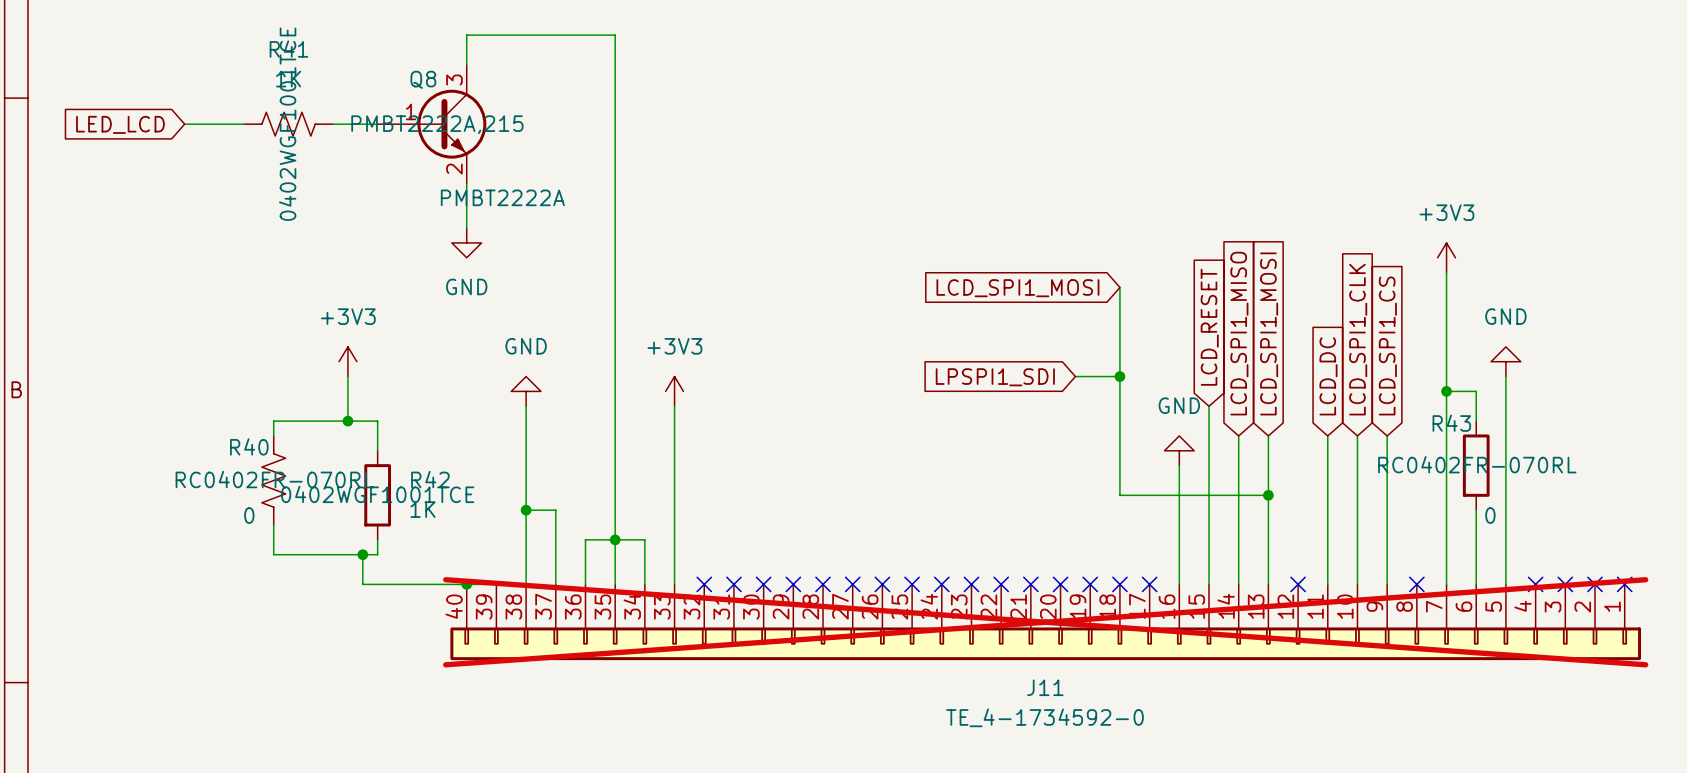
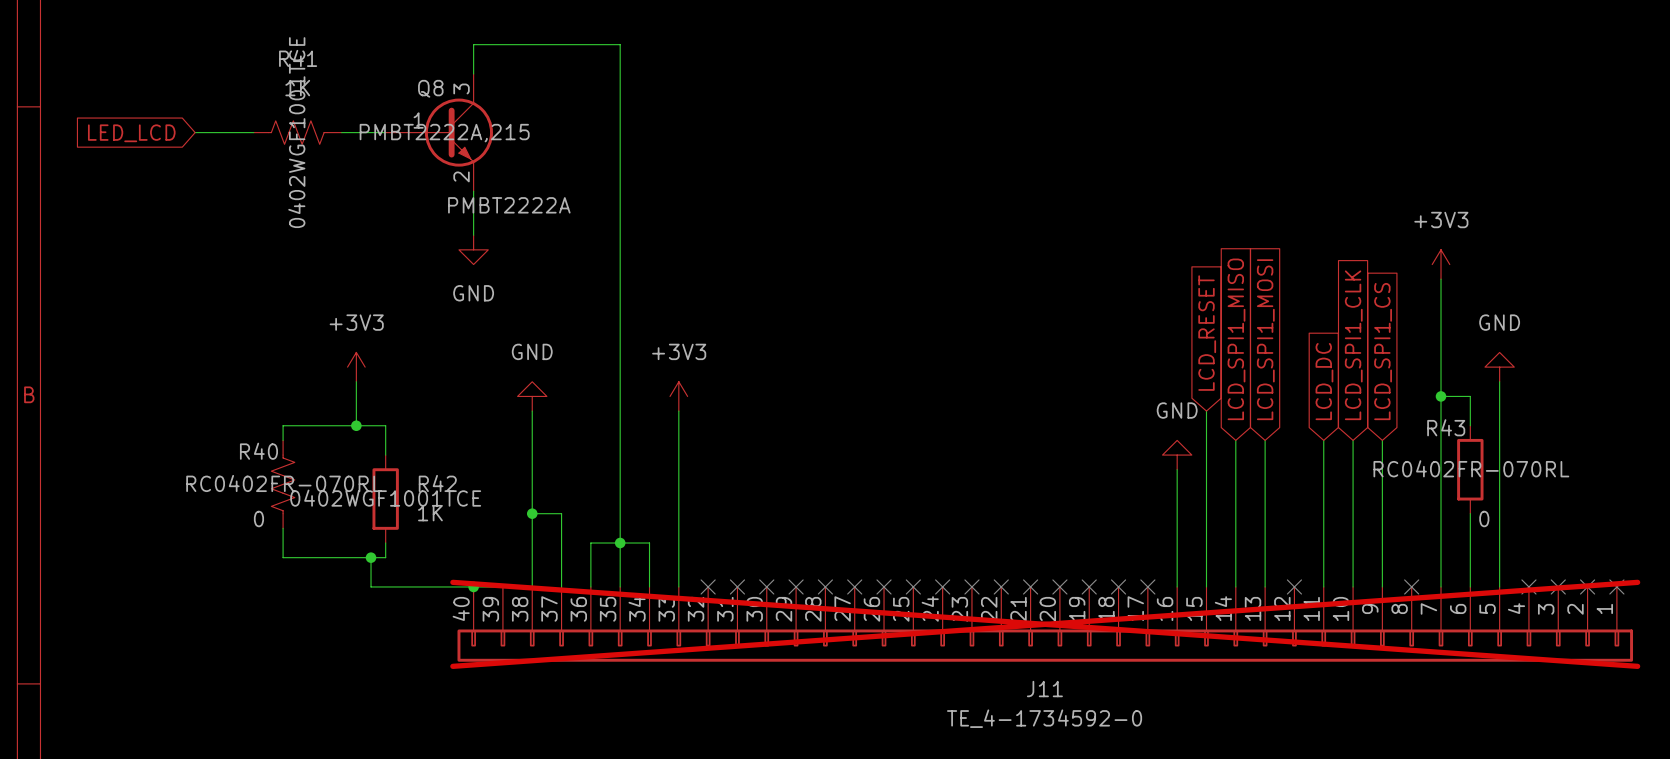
wire: (1119, 287) (1119, 495) (1268, 495) -> none
global label: LCD_SPI1_MOSI (1017, 288) -> none
wire: (1075, 376) (1119, 376) -> none
junction: (1119, 376) -> none
global label: LPSPI1_SDI (995, 377) -> none
junction: (1268, 495) -> none

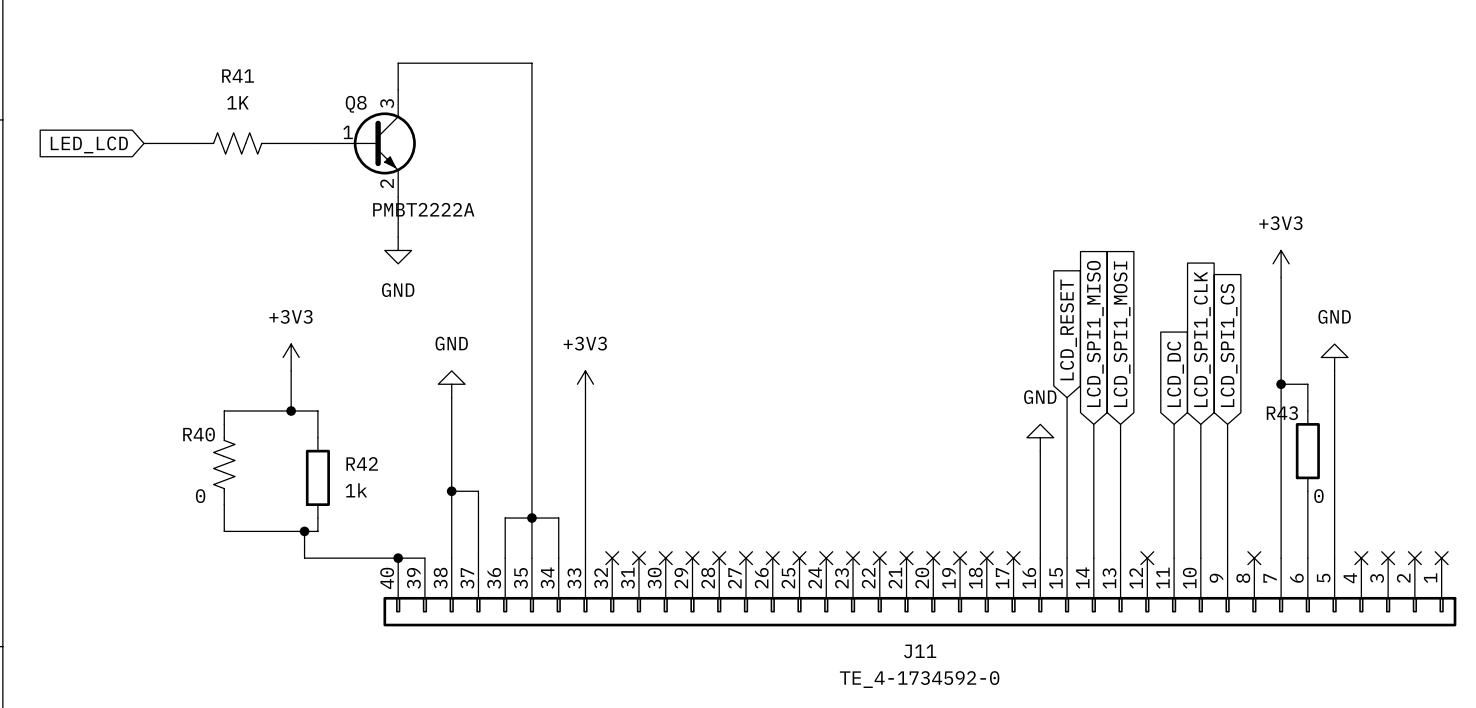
R41 text: 0402WGF1001TCE (296, 132) -> none
Q8 text: PMBT2222A,215 (444, 133) -> none
R43 text: RC0402FR-070RL (1471, 468) -> none
R40 text: RC0402FR-070RL (284, 483) -> none
R42 text: 0402WGF1001TCE (385, 498) -> none
R42 value: 1K (430, 513) -> 1k (356, 490)
J11 do-not-place cross: (1045, 624) -> none

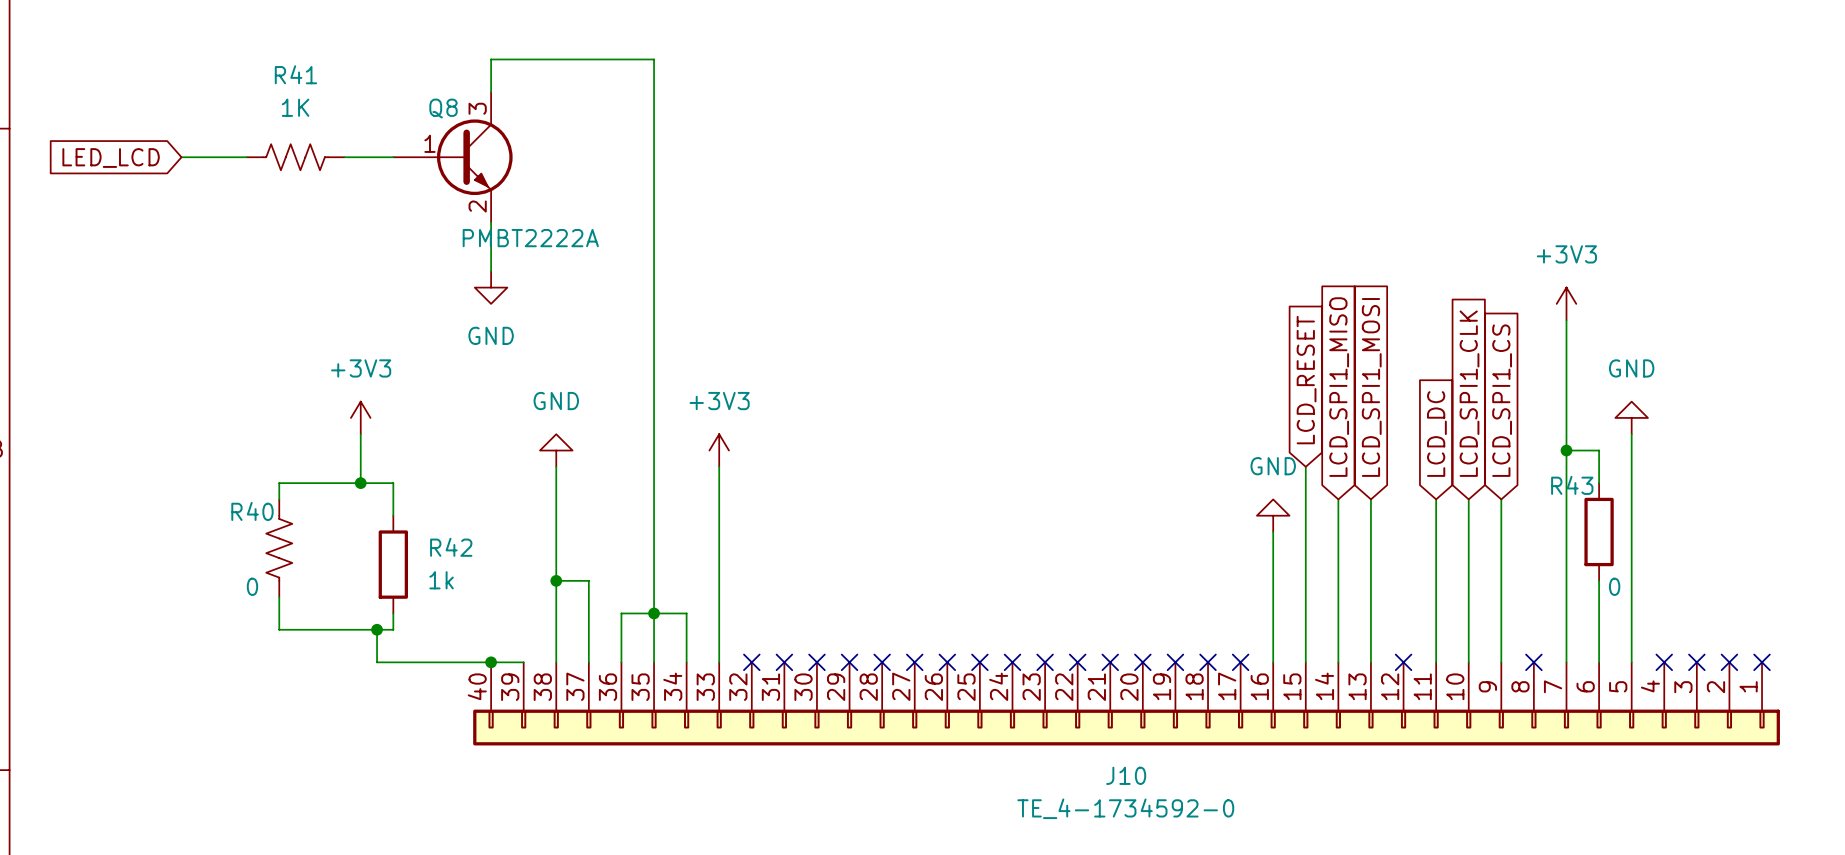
J11 name: J11 (920, 651) -> J10 (1126, 775)

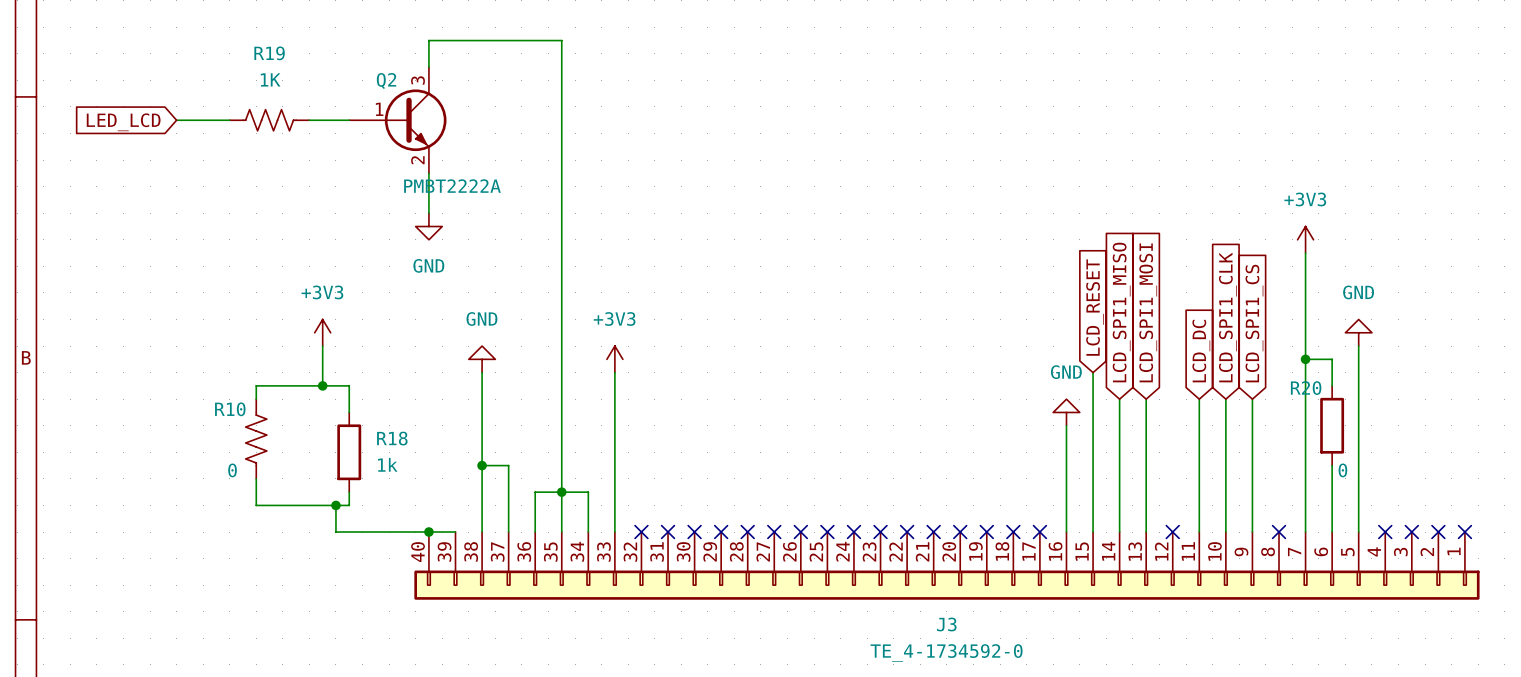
R41 name: R41 (295, 74) -> R19 (269, 53)
Q8 name: Q8 (443, 108) -> Q2 (386, 81)
R43 name: R43 (1572, 485) -> R20 (1306, 388)
R40 name: R40 (252, 511) -> R10 (230, 409)
R42 name: R42 (451, 547) -> R18 (392, 438)
J10 name: J10 (1126, 775) -> J3 (946, 624)

